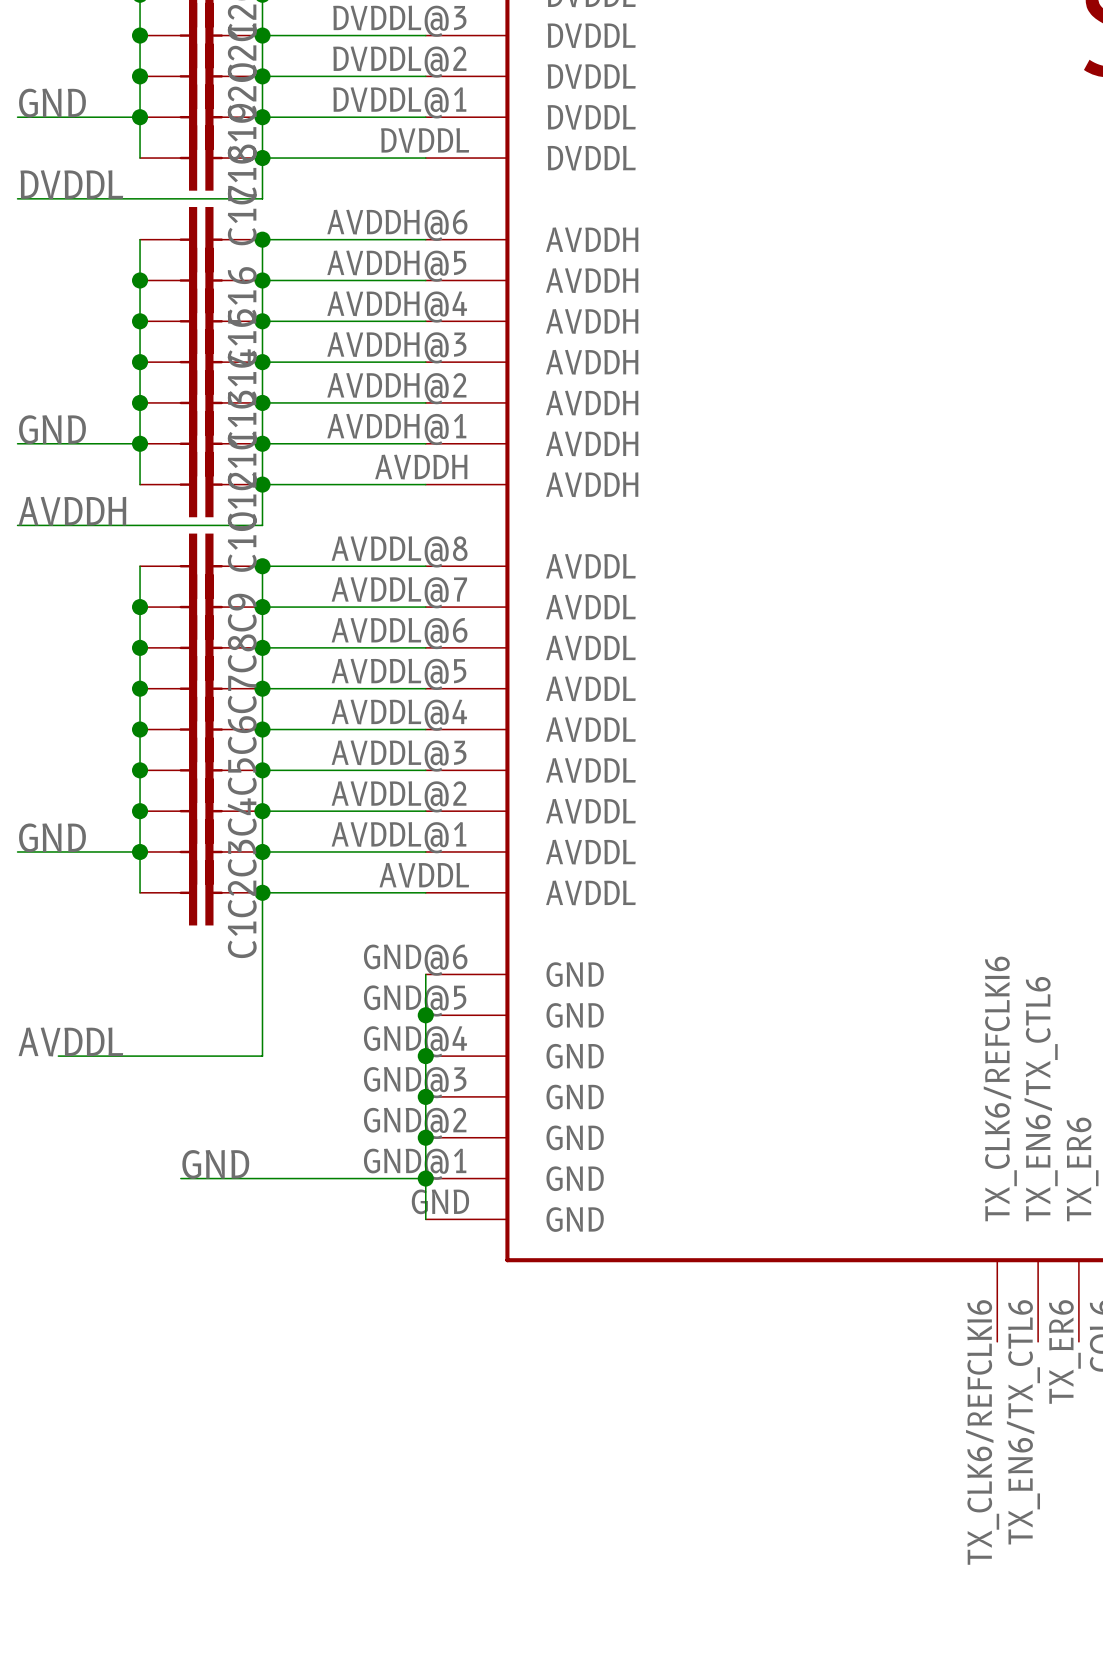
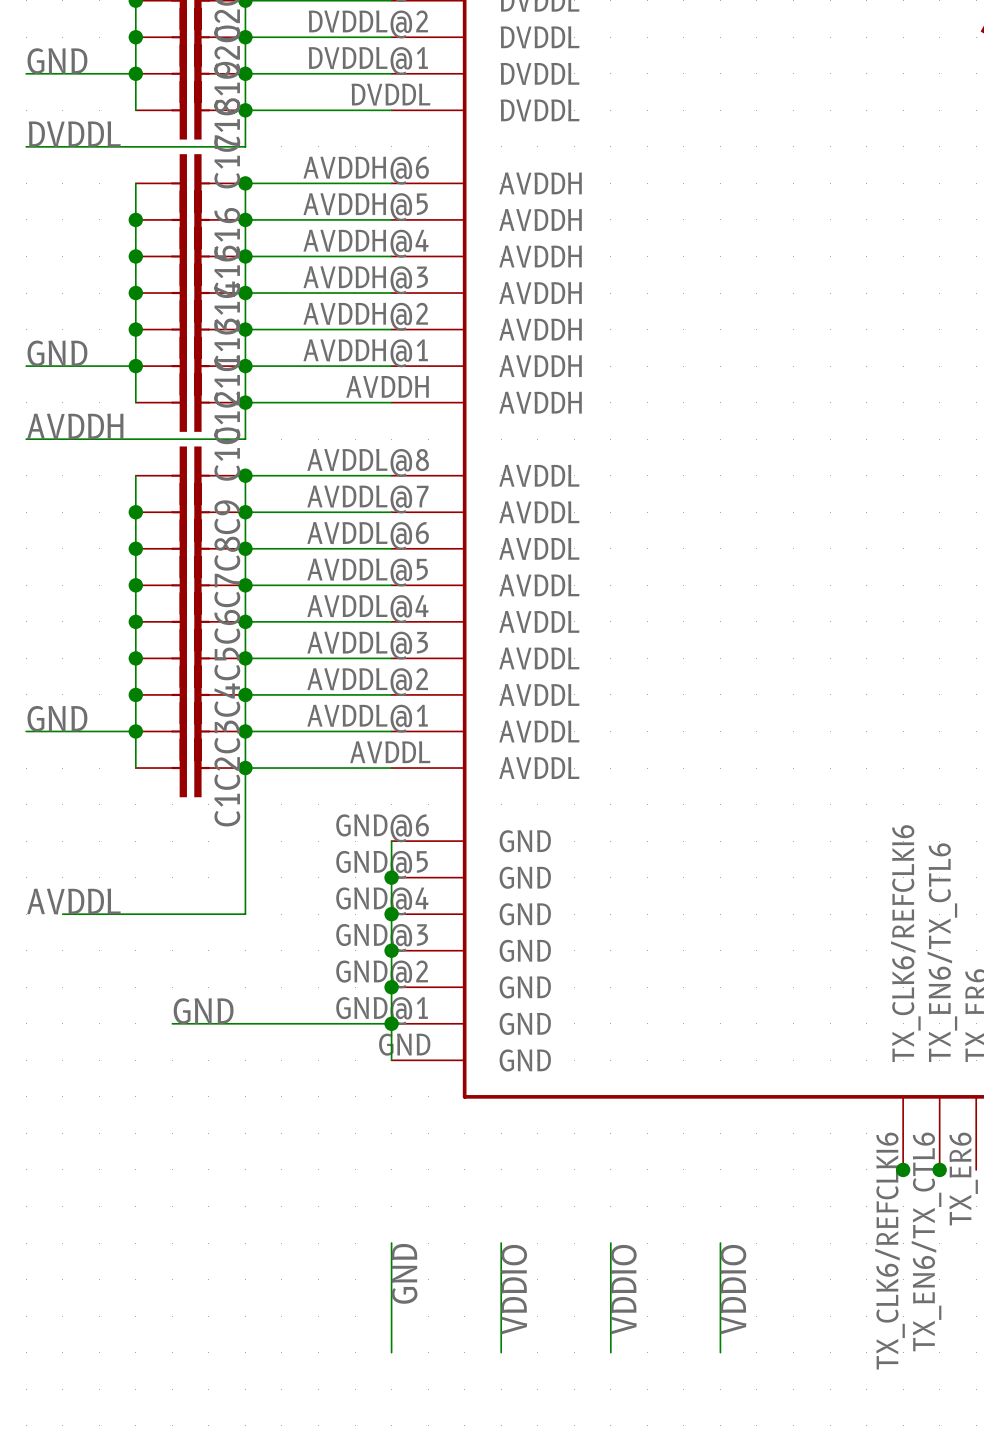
junction: none -> (903, 1169)
junction: none -> (939, 1169)
wire: none -> (391, 1243) (391, 1352)
wire: none -> (501, 1243) (501, 1352)
wire: none -> (610, 1243) (610, 1352)
wire: none -> (720, 1243) (720, 1352)
label: none -> GND (404, 1273)
label: none -> VDDIO (514, 1289)
label: none -> VDDIO (623, 1289)
label: none -> VDDIO (733, 1289)

